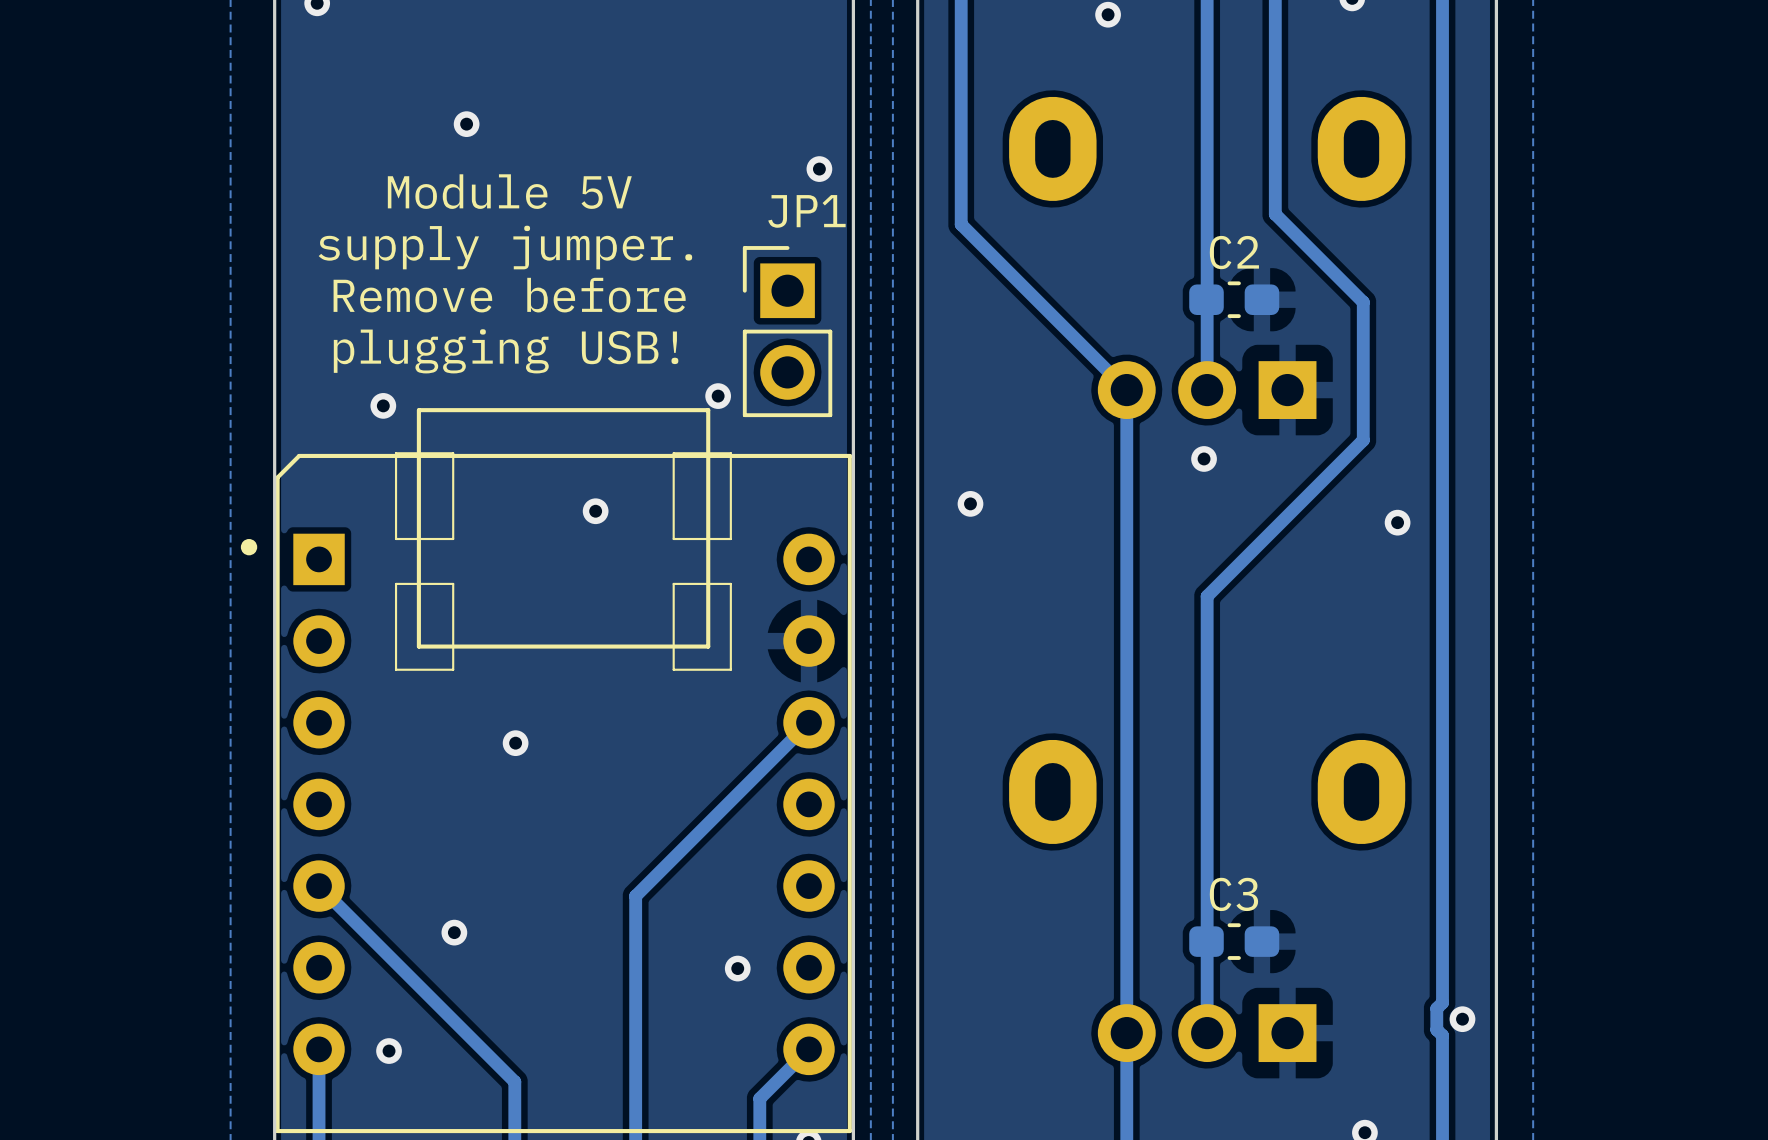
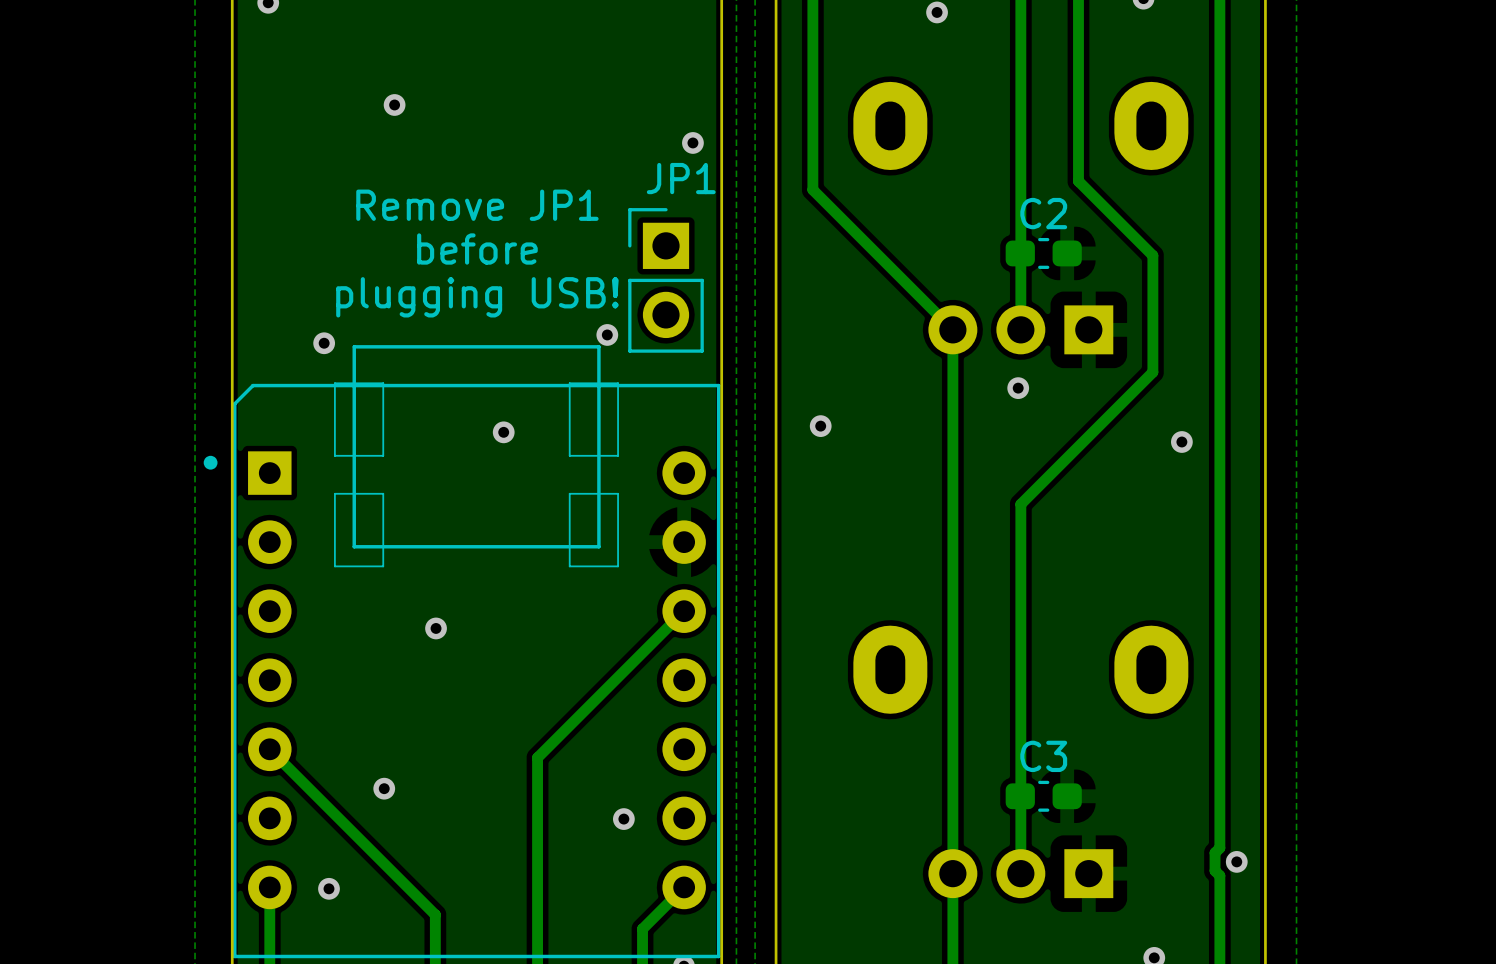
text: Module 5V (509, 191) -> none
text: none -> Remove JP1 (477, 205)
text: supply jumper. (505, 247) -> none
text: none -> before (477, 248)
text: Remove before (509, 295) -> none
text position: plugging USB! (506, 351) -> plugging USB! (477, 297)

